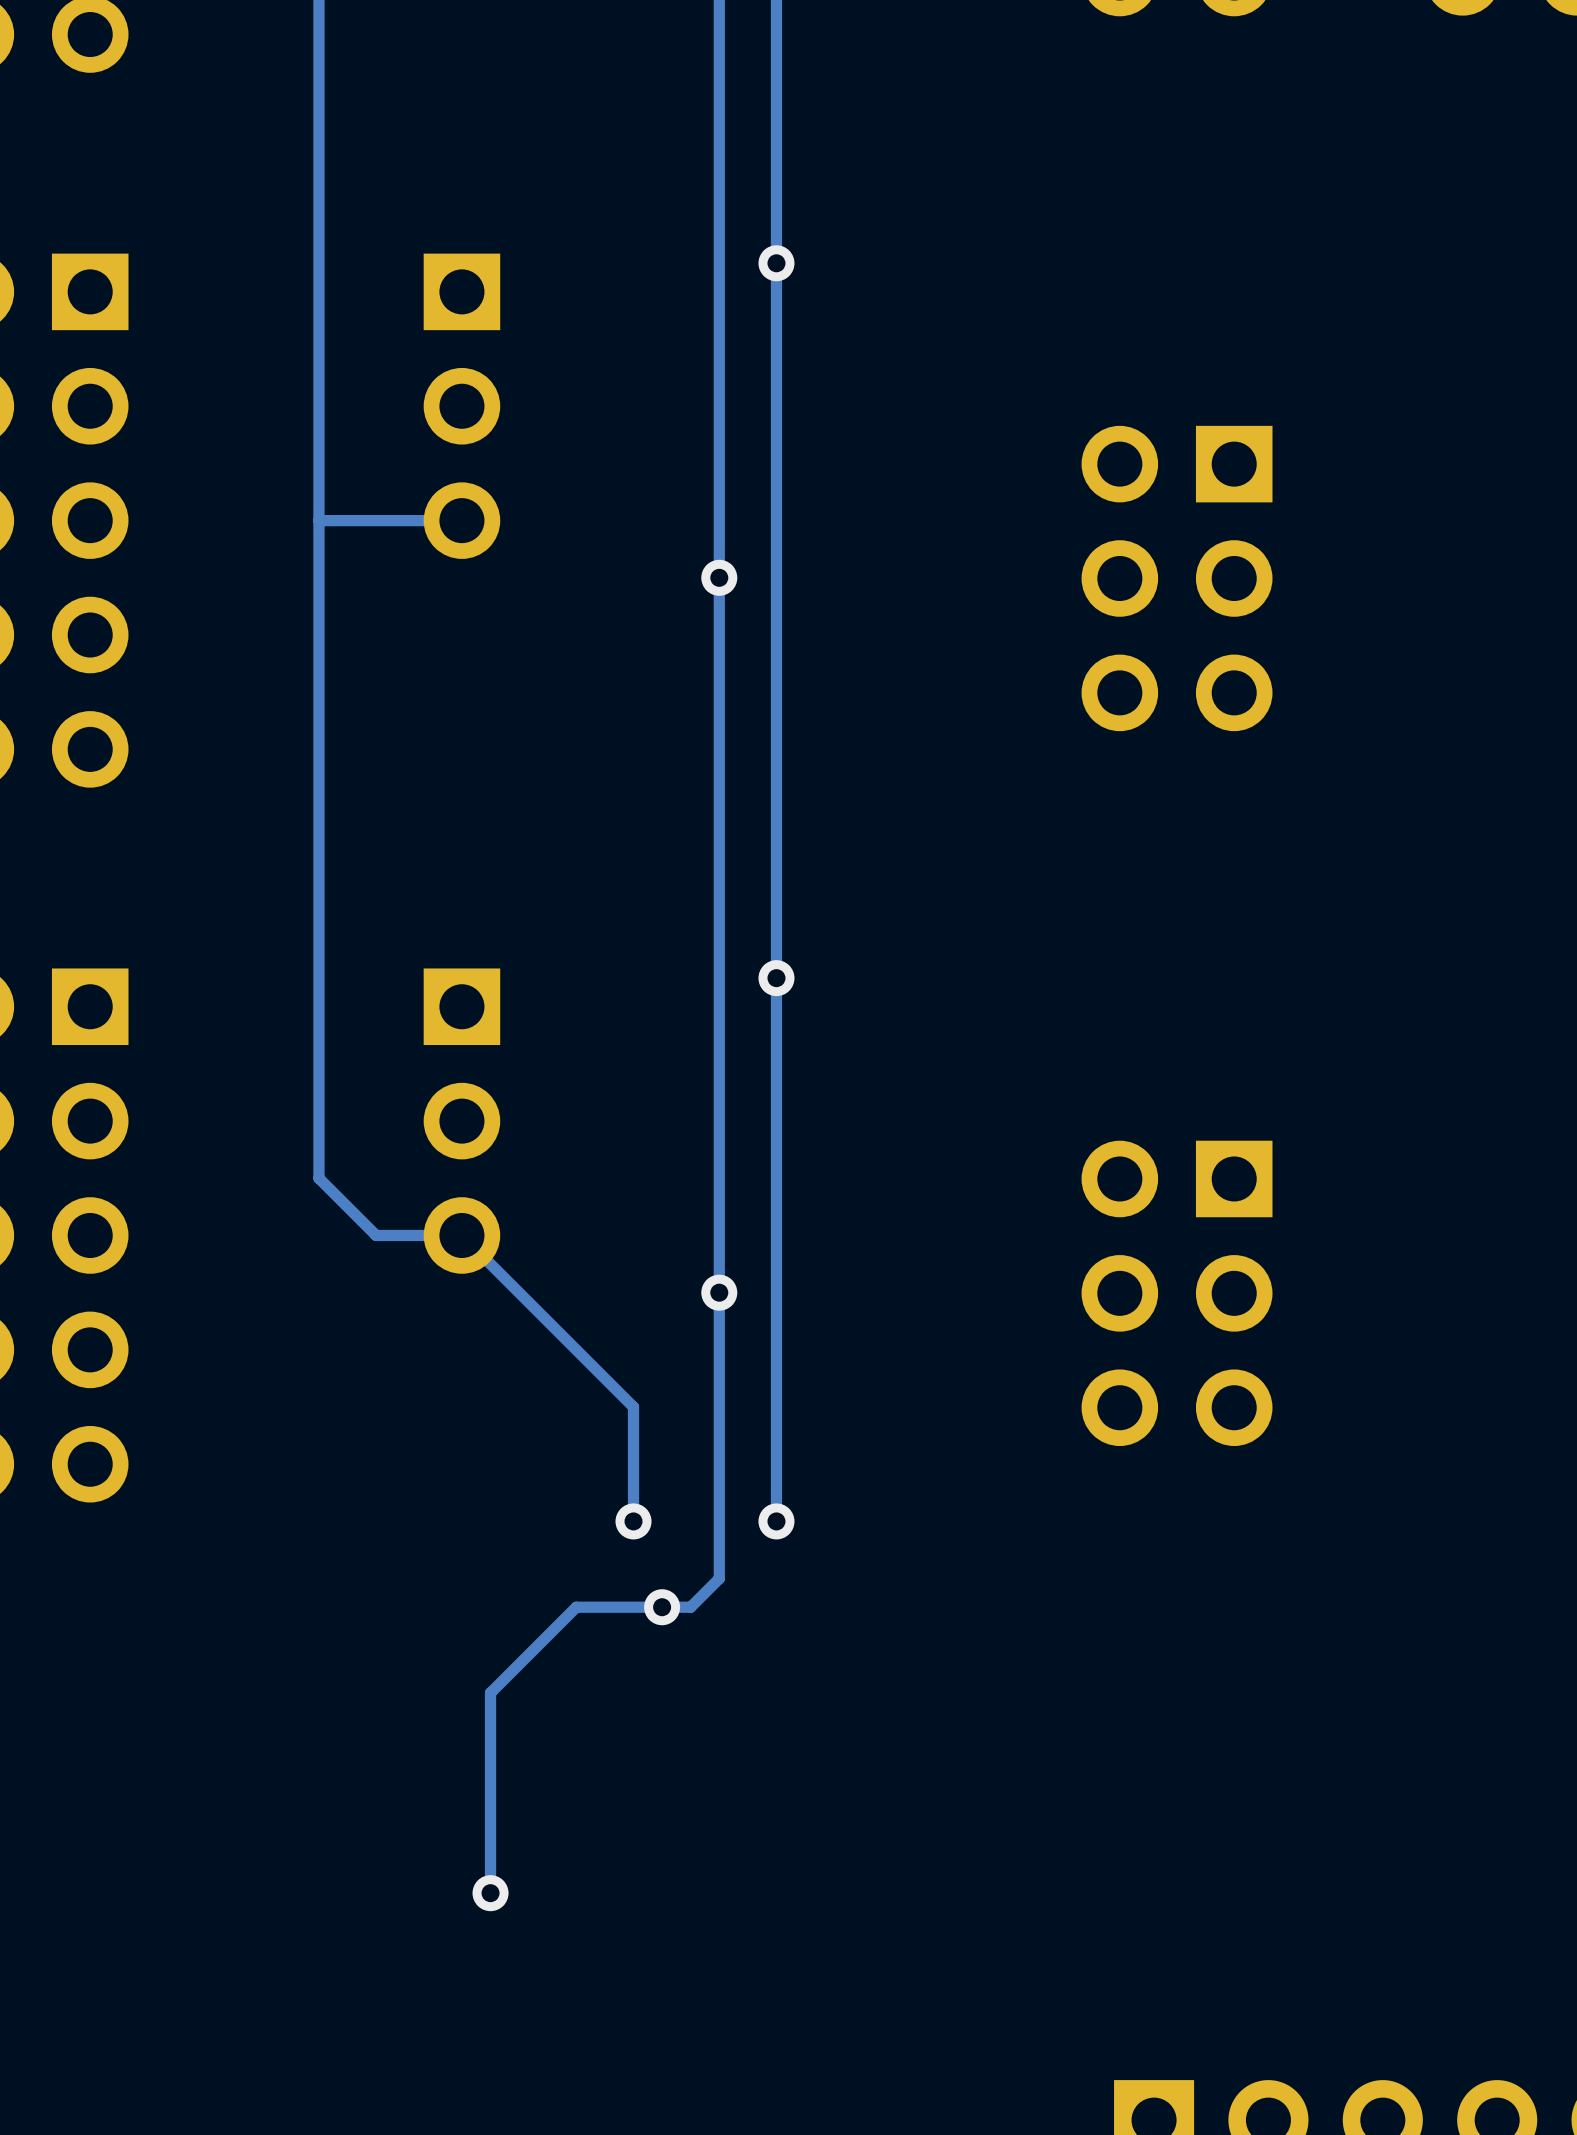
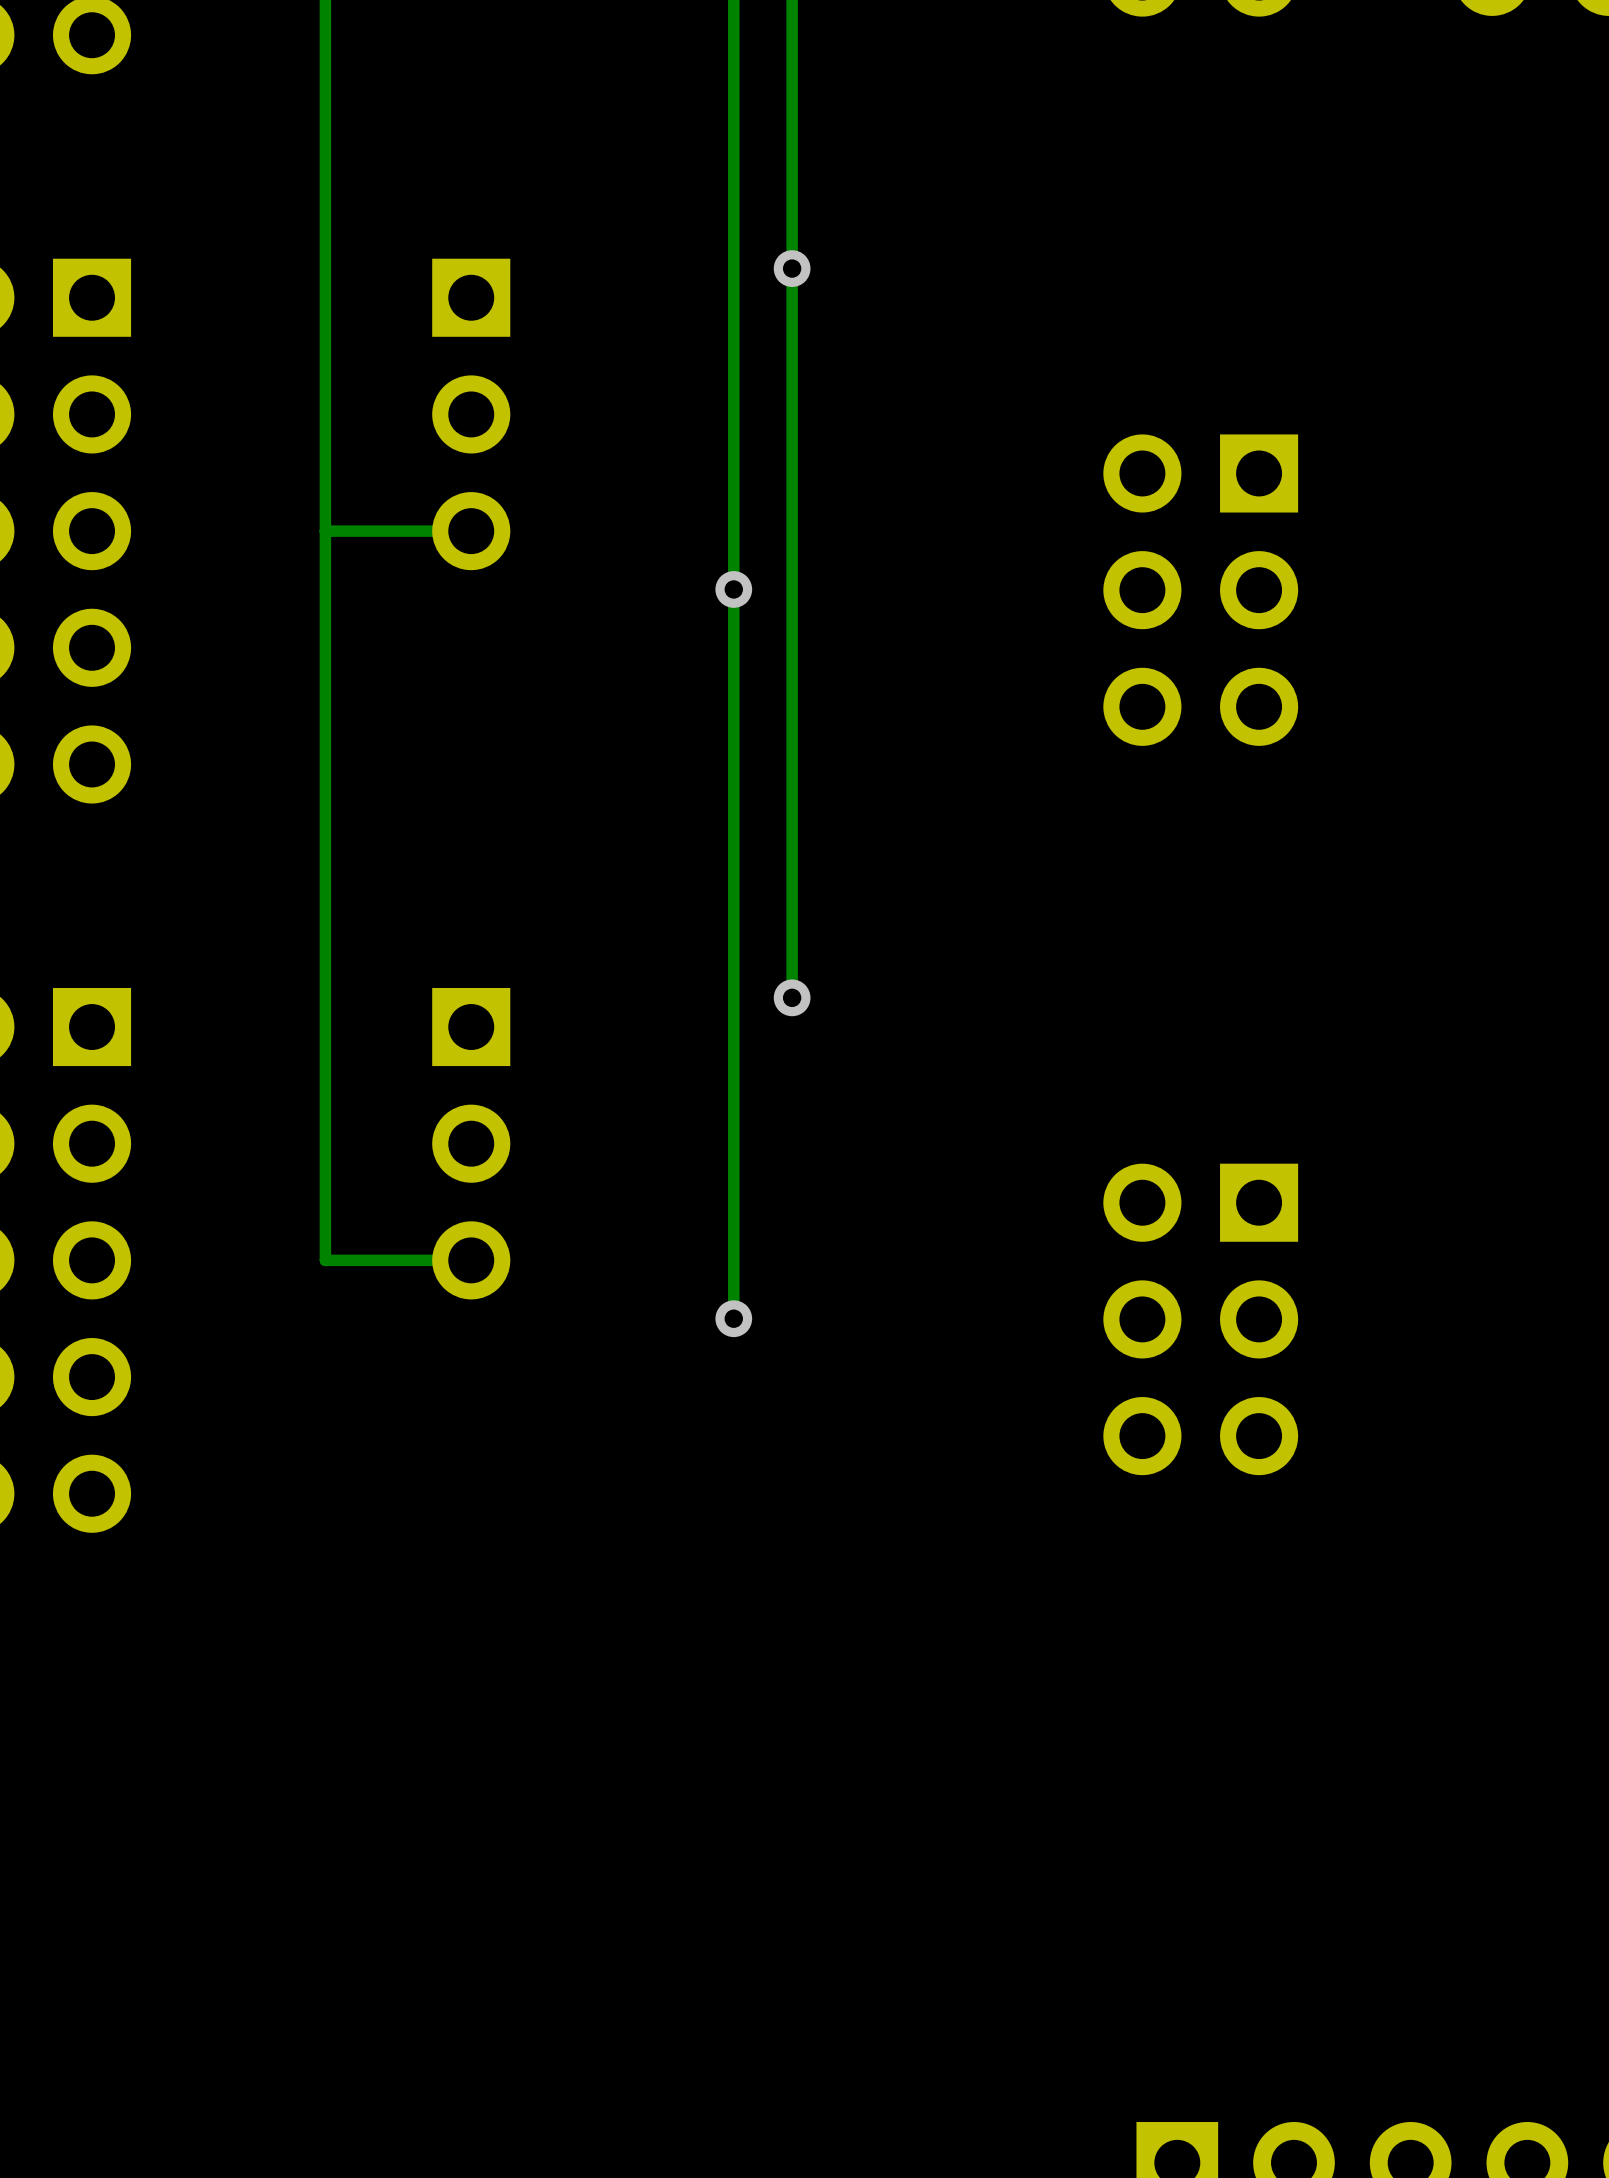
track: (776, 978) (776, 1521) -> none
track: (318, 1178) (376, 1235) -> (325, 1202) (325, 1260) (383, 1260)
track: (461, 1235) (633, 1407) (633, 1521) -> none
track: (719, 1292) (719, 1578) (690, 1607) (576, 1607) (490, 1693) (490, 1893) -> none
via: (633, 1521) -> none
via: (776, 1521) -> none
via: (662, 1607) -> none
via: (490, 1893) -> none

